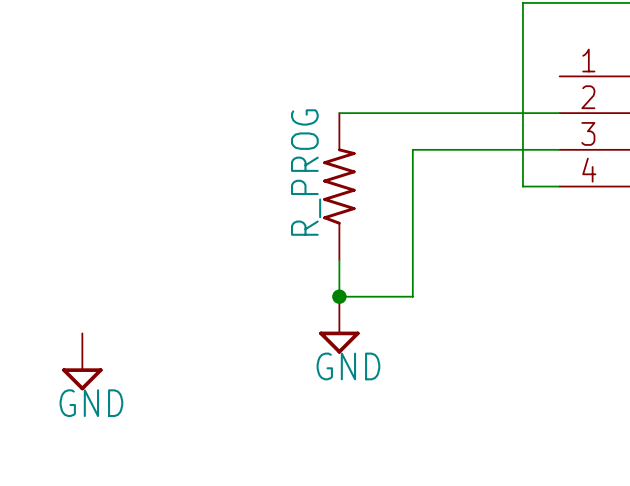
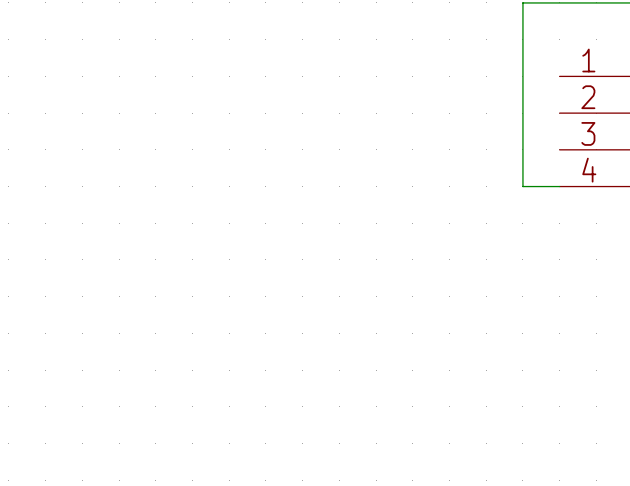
wire: (339, 113) (559, 113) -> none
wire: (559, 149) (412, 149) (412, 296) (339, 296) (339, 259) -> none
R_PROG: (339, 186) -> none
junction: (339, 296) -> none
power symbol: GND (339, 325) -> none
power symbol: GND (82, 361) -> none

